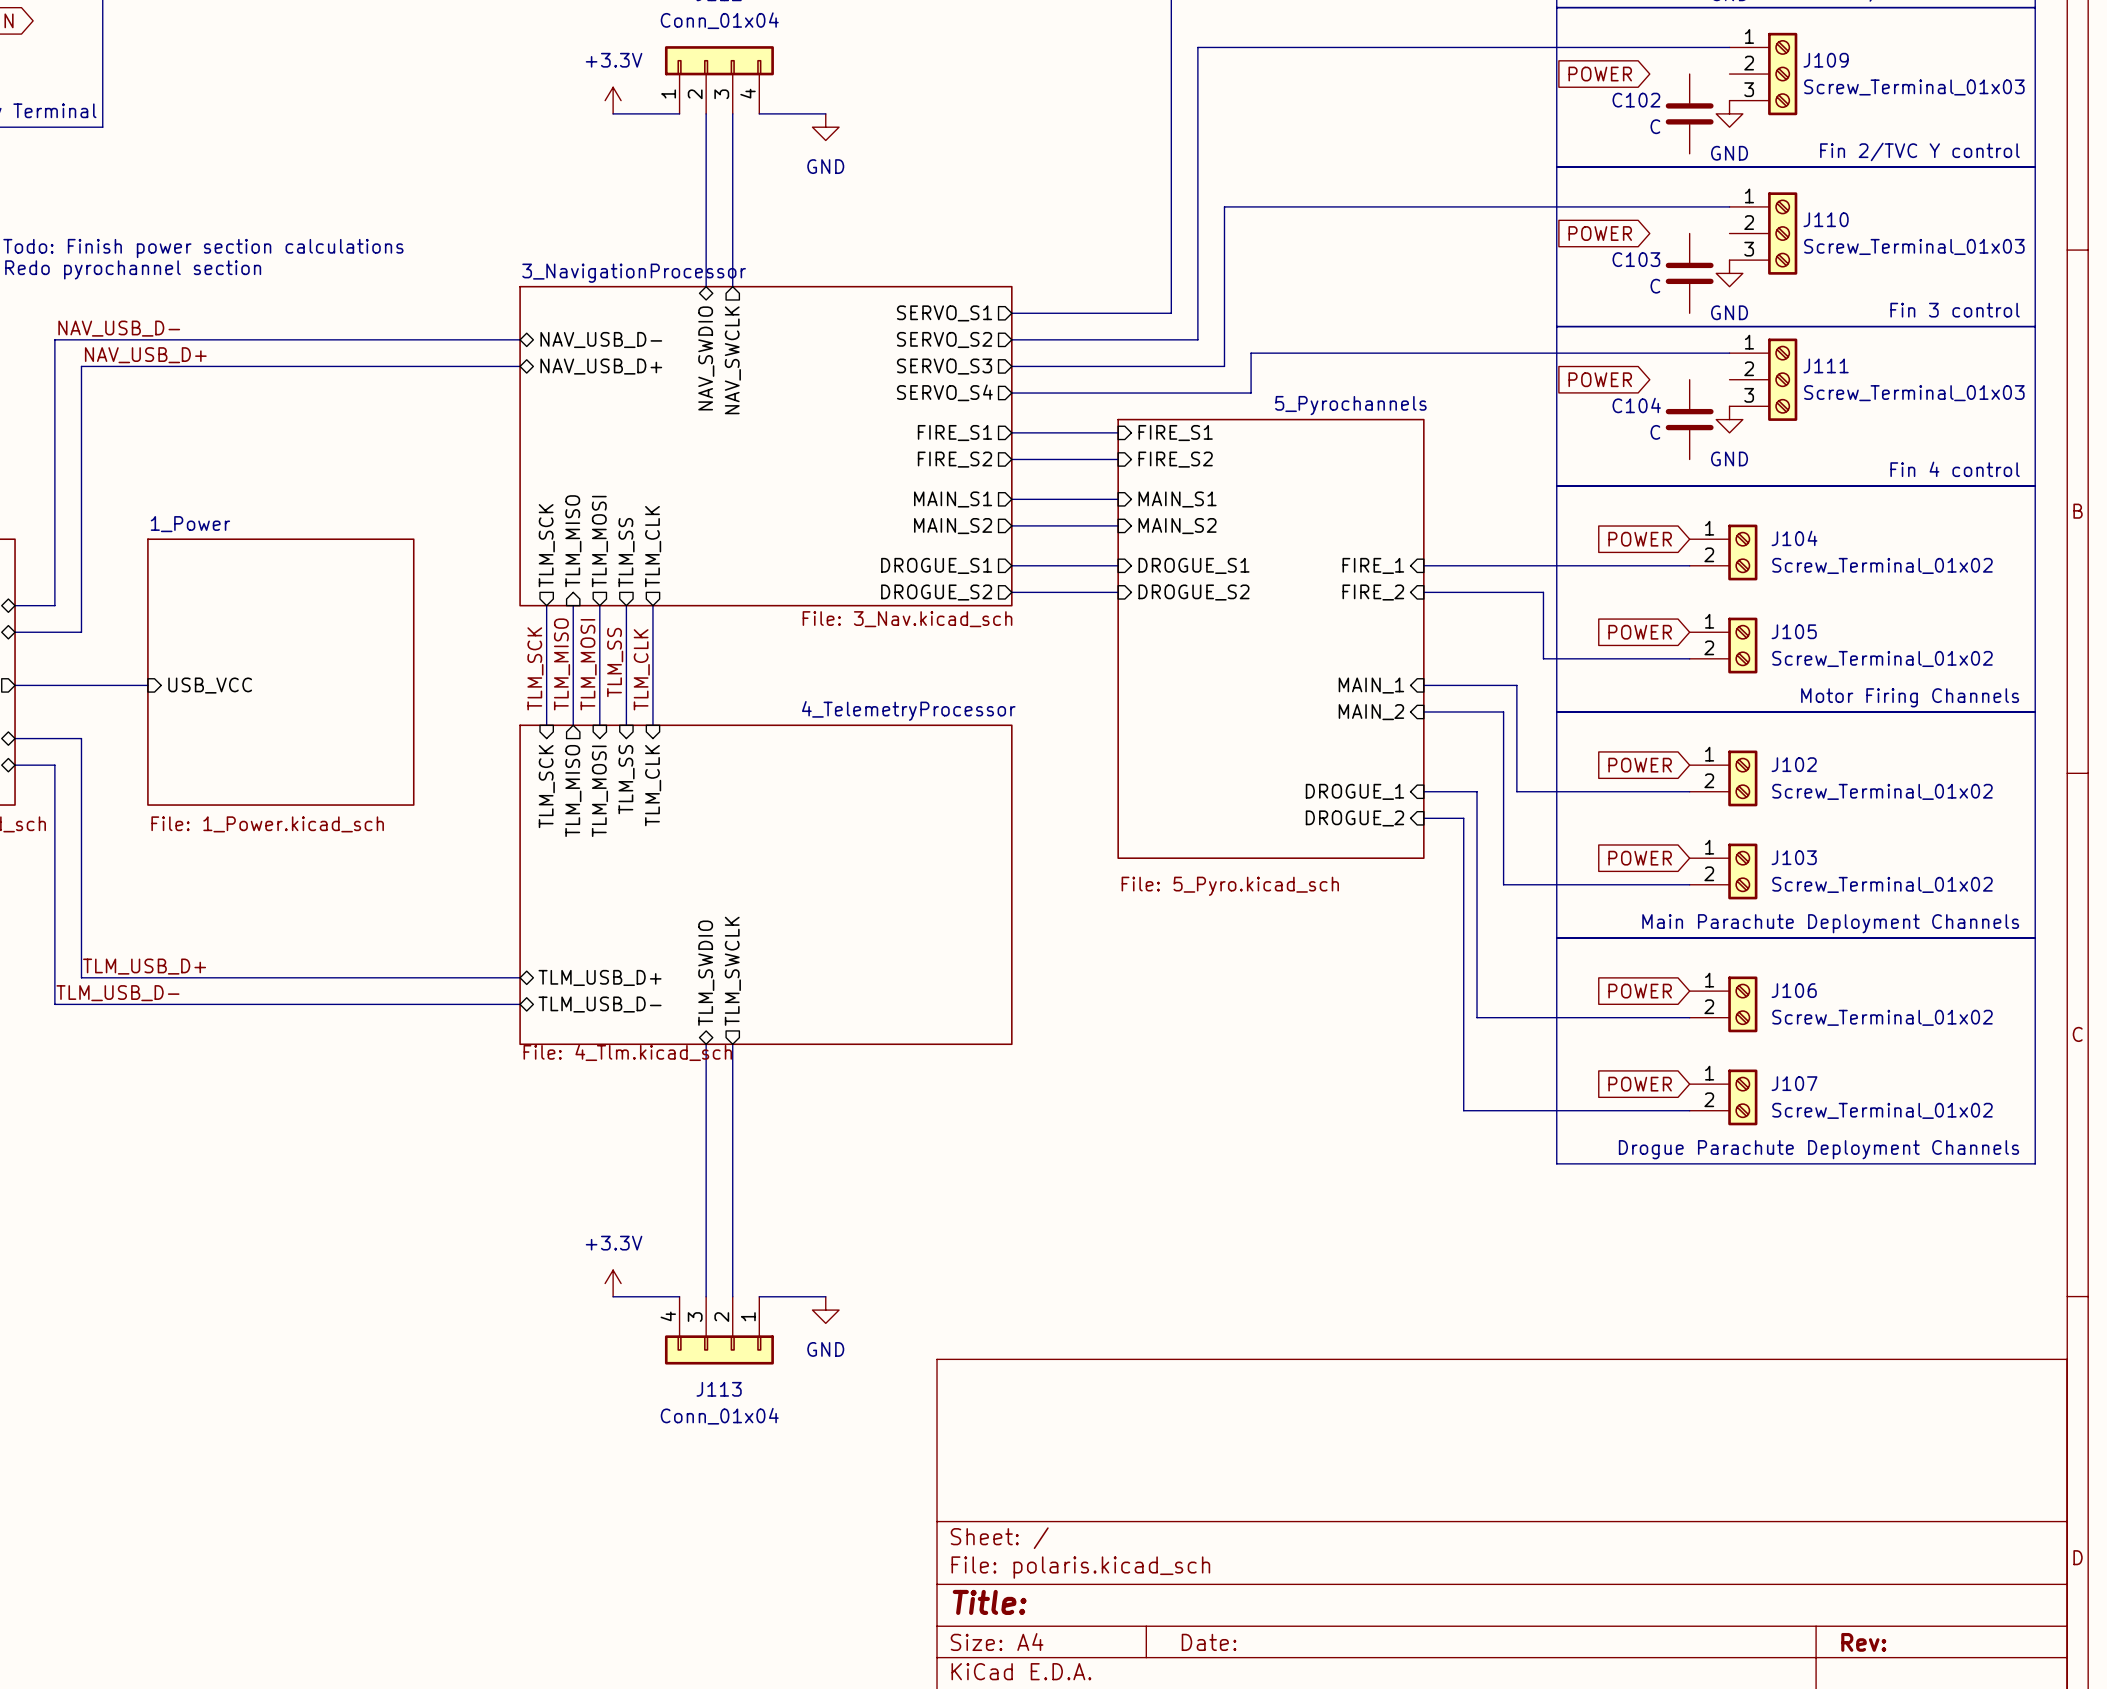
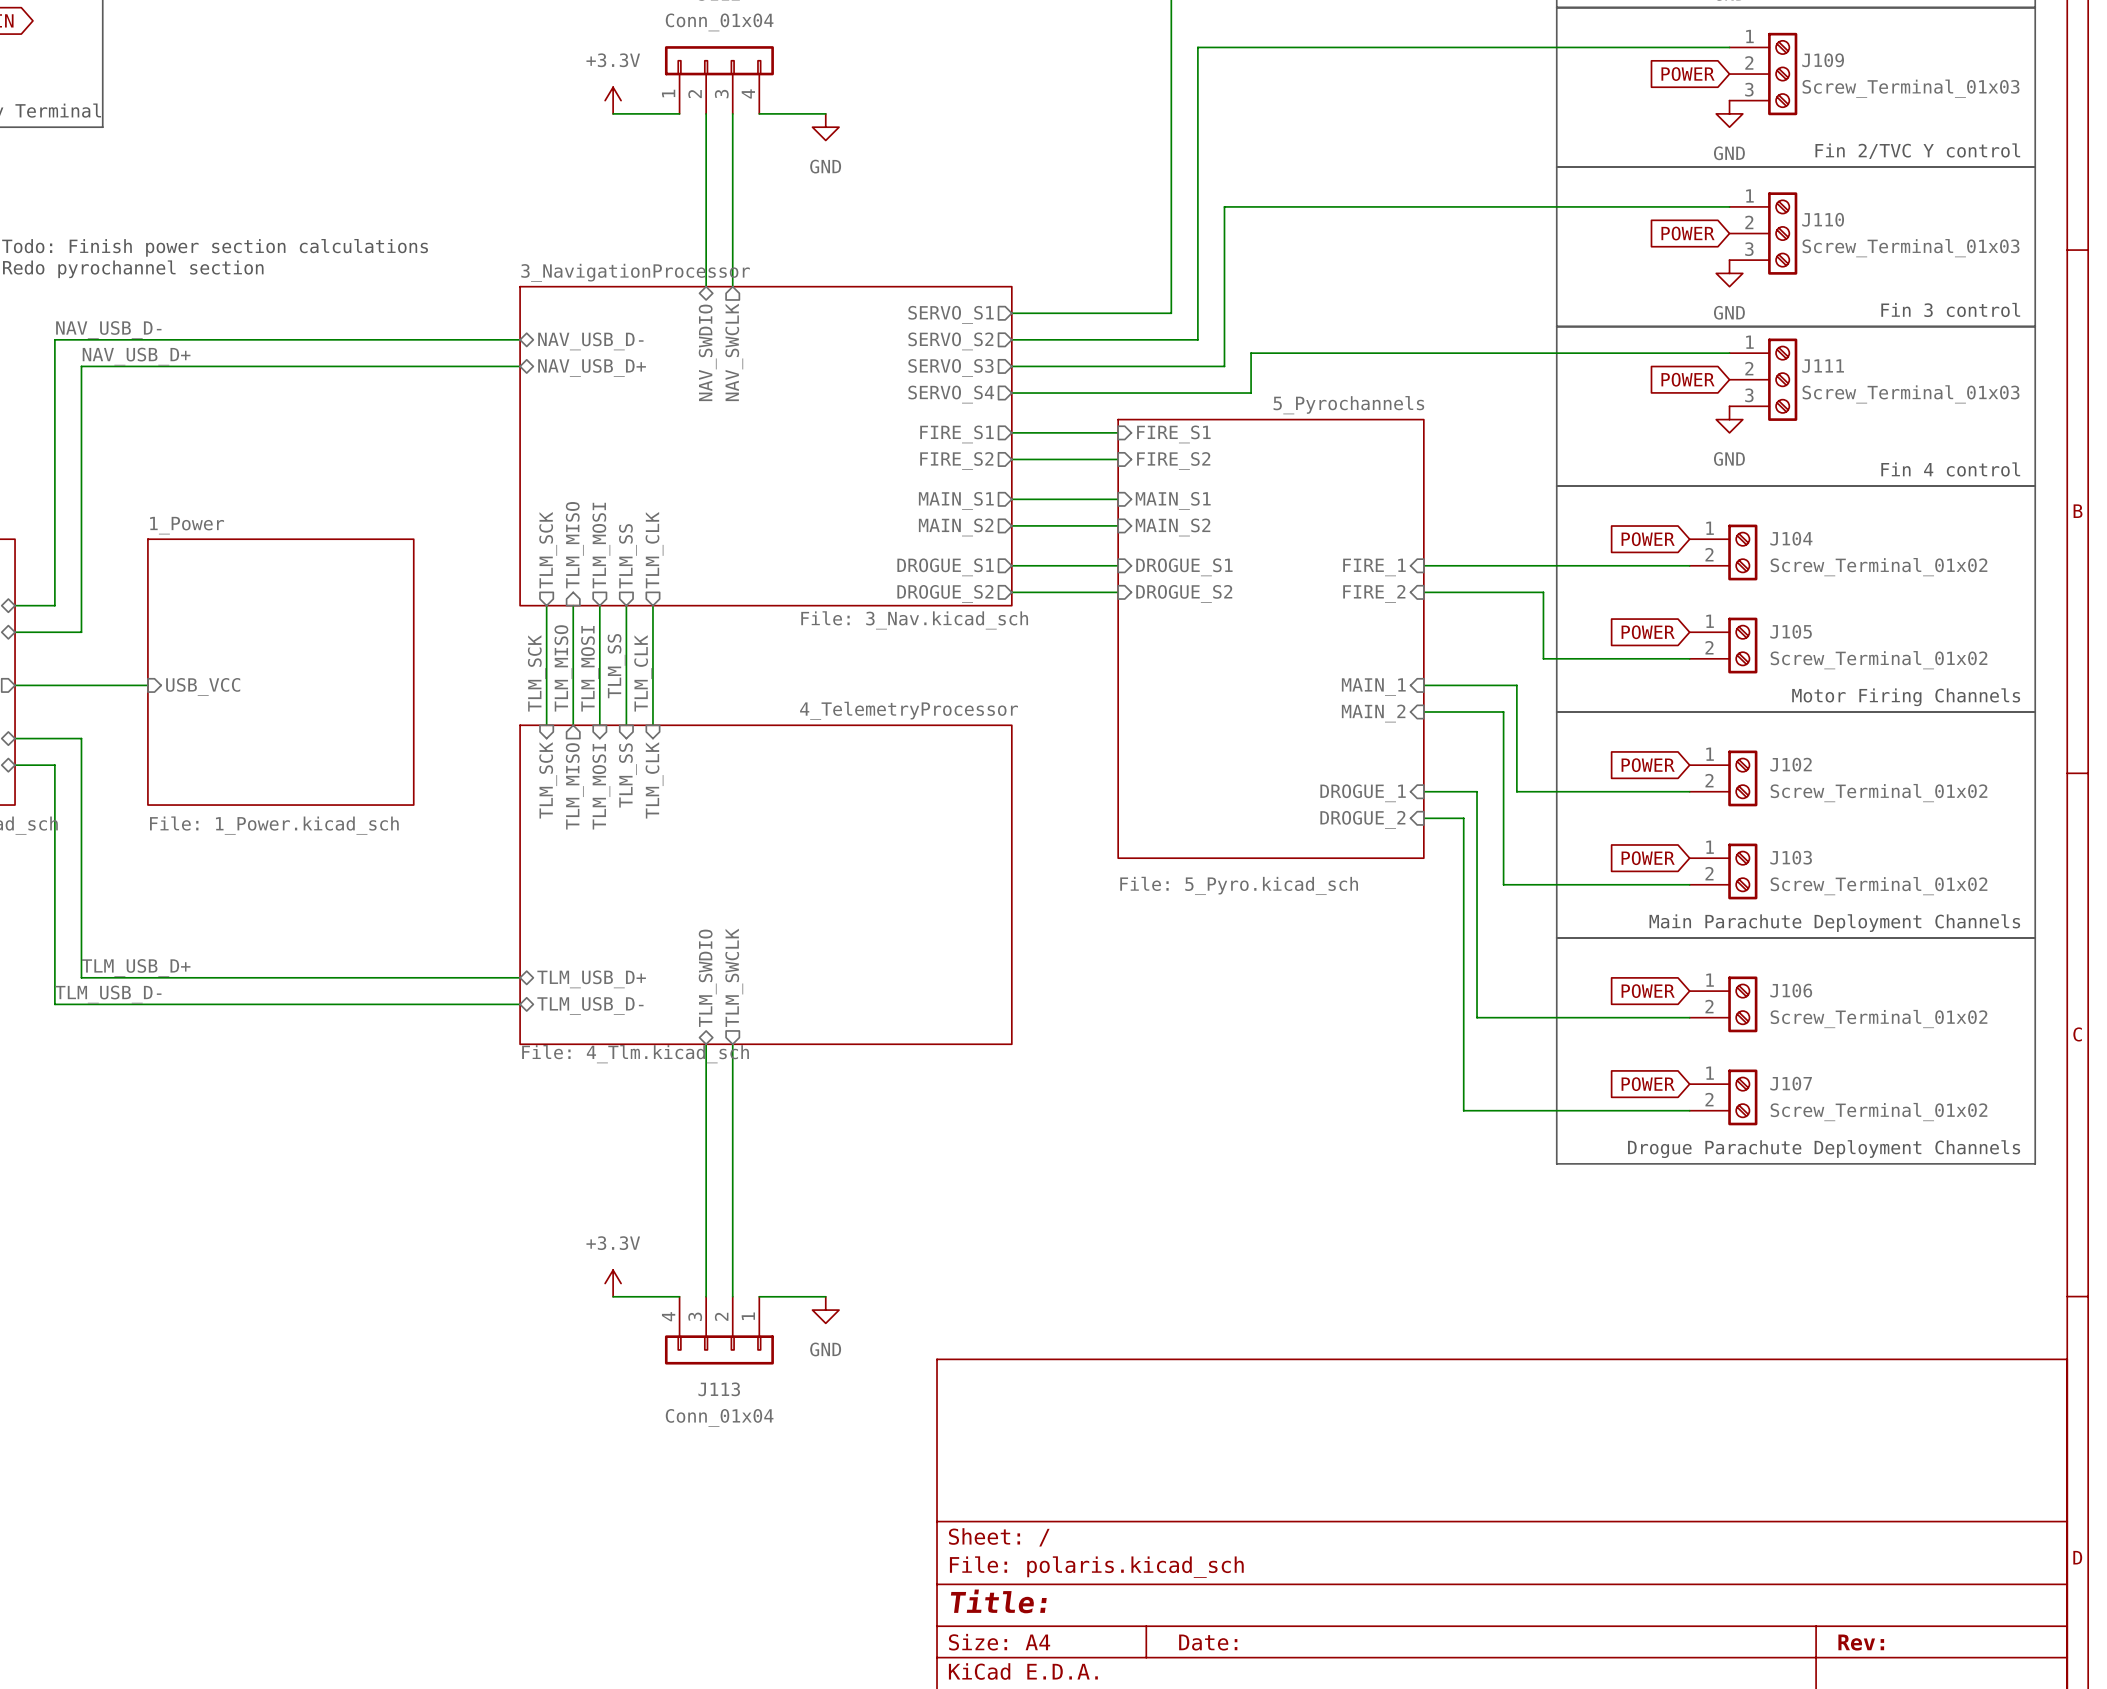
global label position: POWER (1600, 74) -> POWER (1688, 74)
C102: C (1689, 113) -> none
global label position: POWER (1600, 233) -> POWER (1688, 233)
C103: C (1689, 273) -> none
global label position: POWER (1600, 379) -> POWER (1688, 379)
C104: C (1689, 419) -> none

